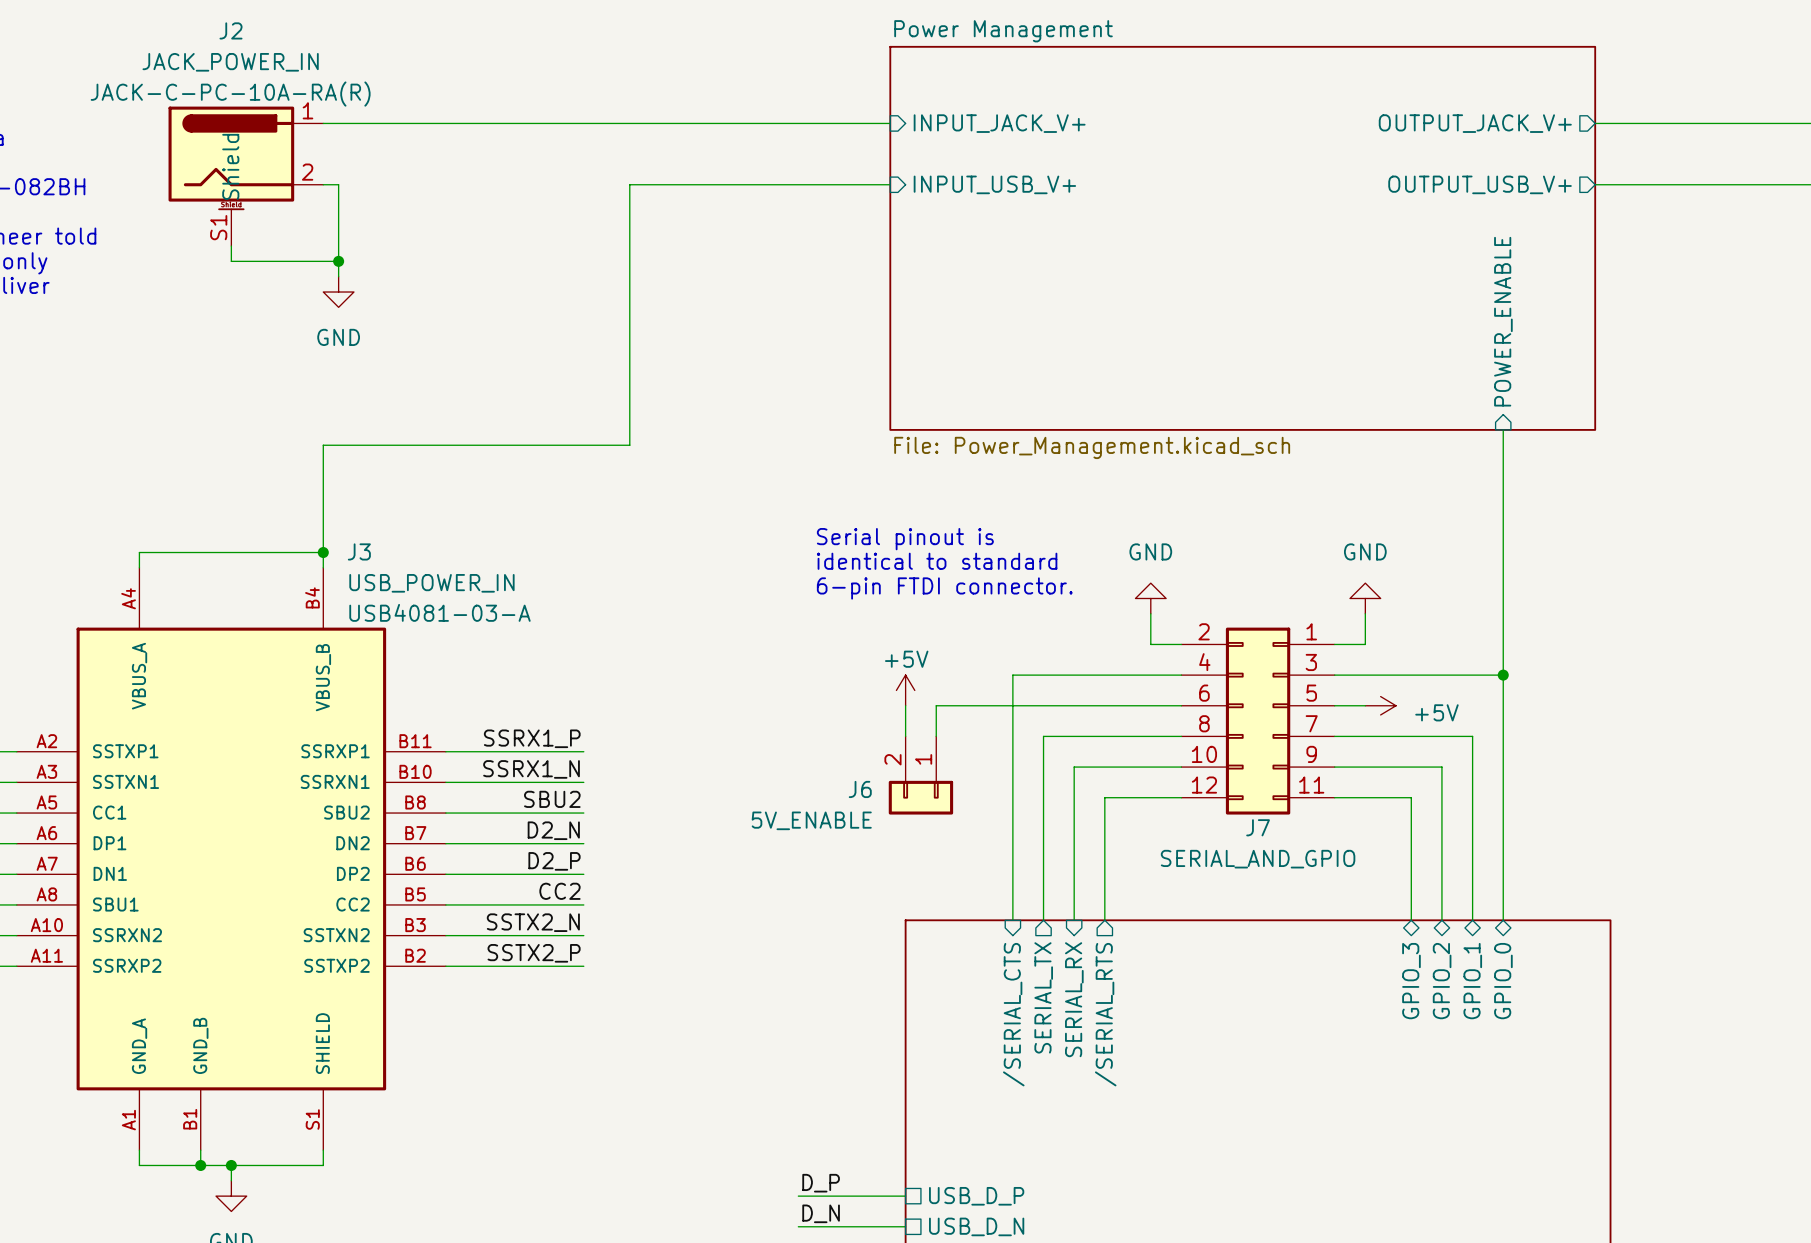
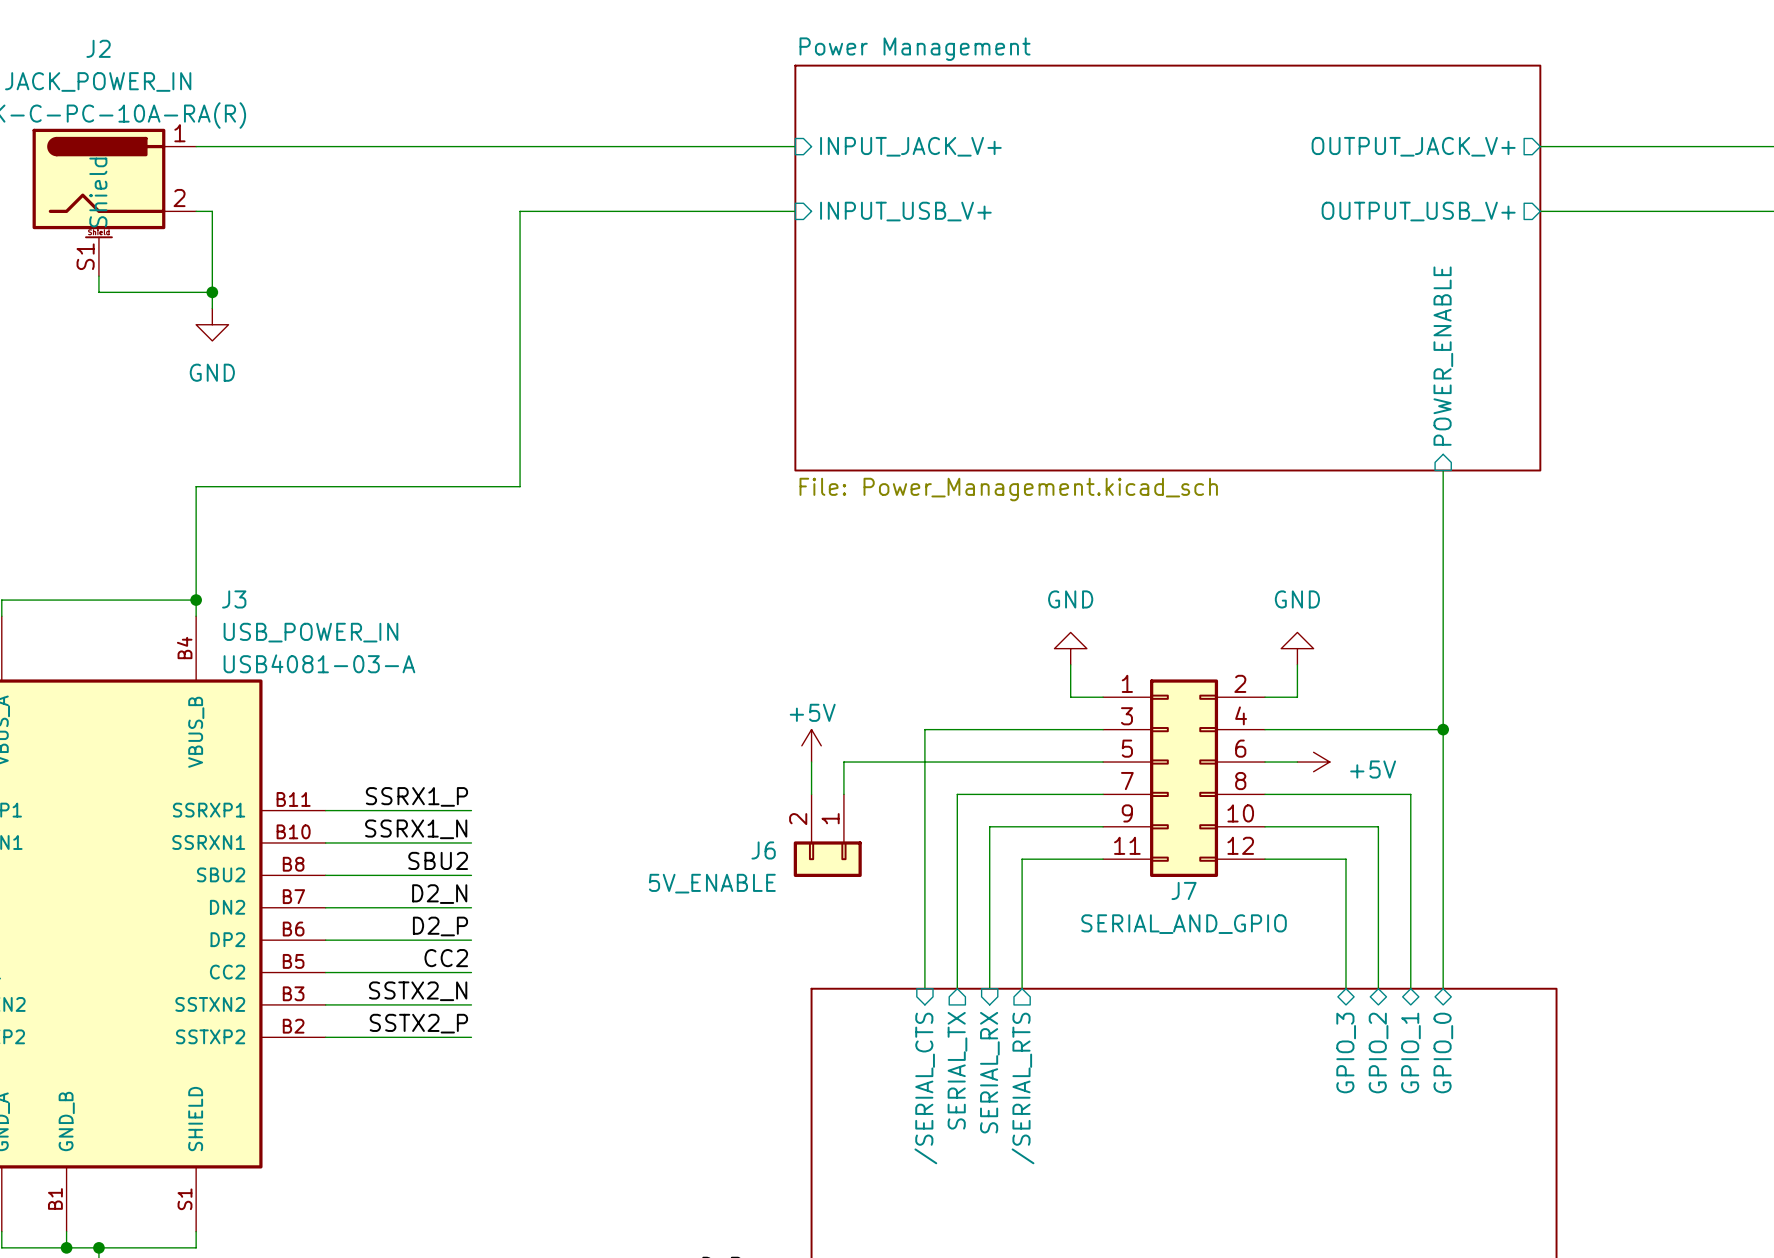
text: Serial pinout is (905, 539) -> none
text: identical to standard (937, 561) -> none
text: 6-pin FTDI connector. (944, 588) -> none
J7 flip: as is (1258, 721) -> left-right (1184, 778)

